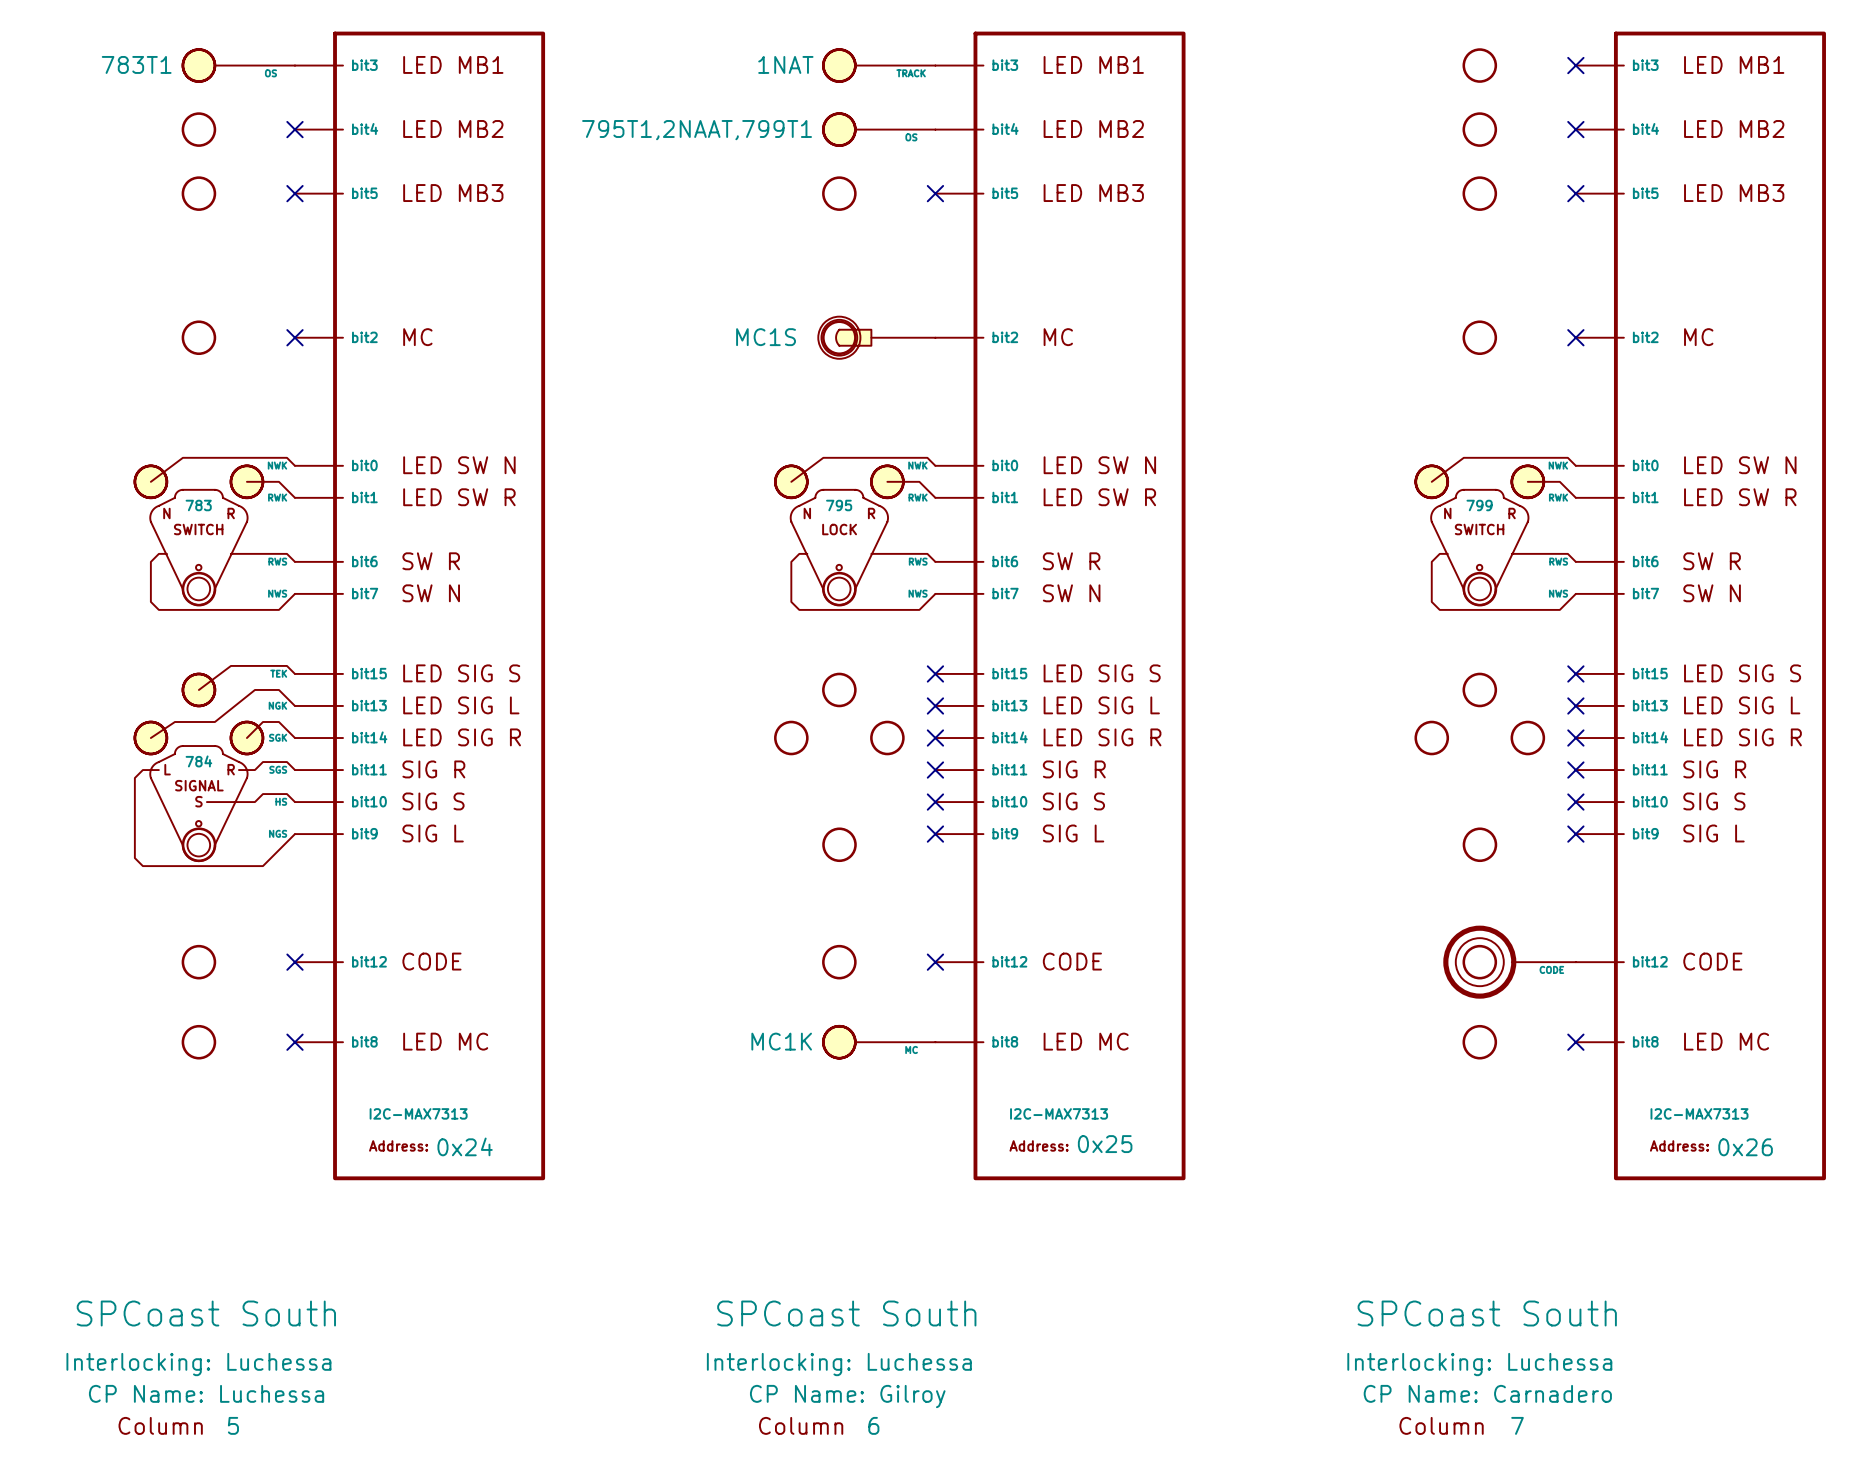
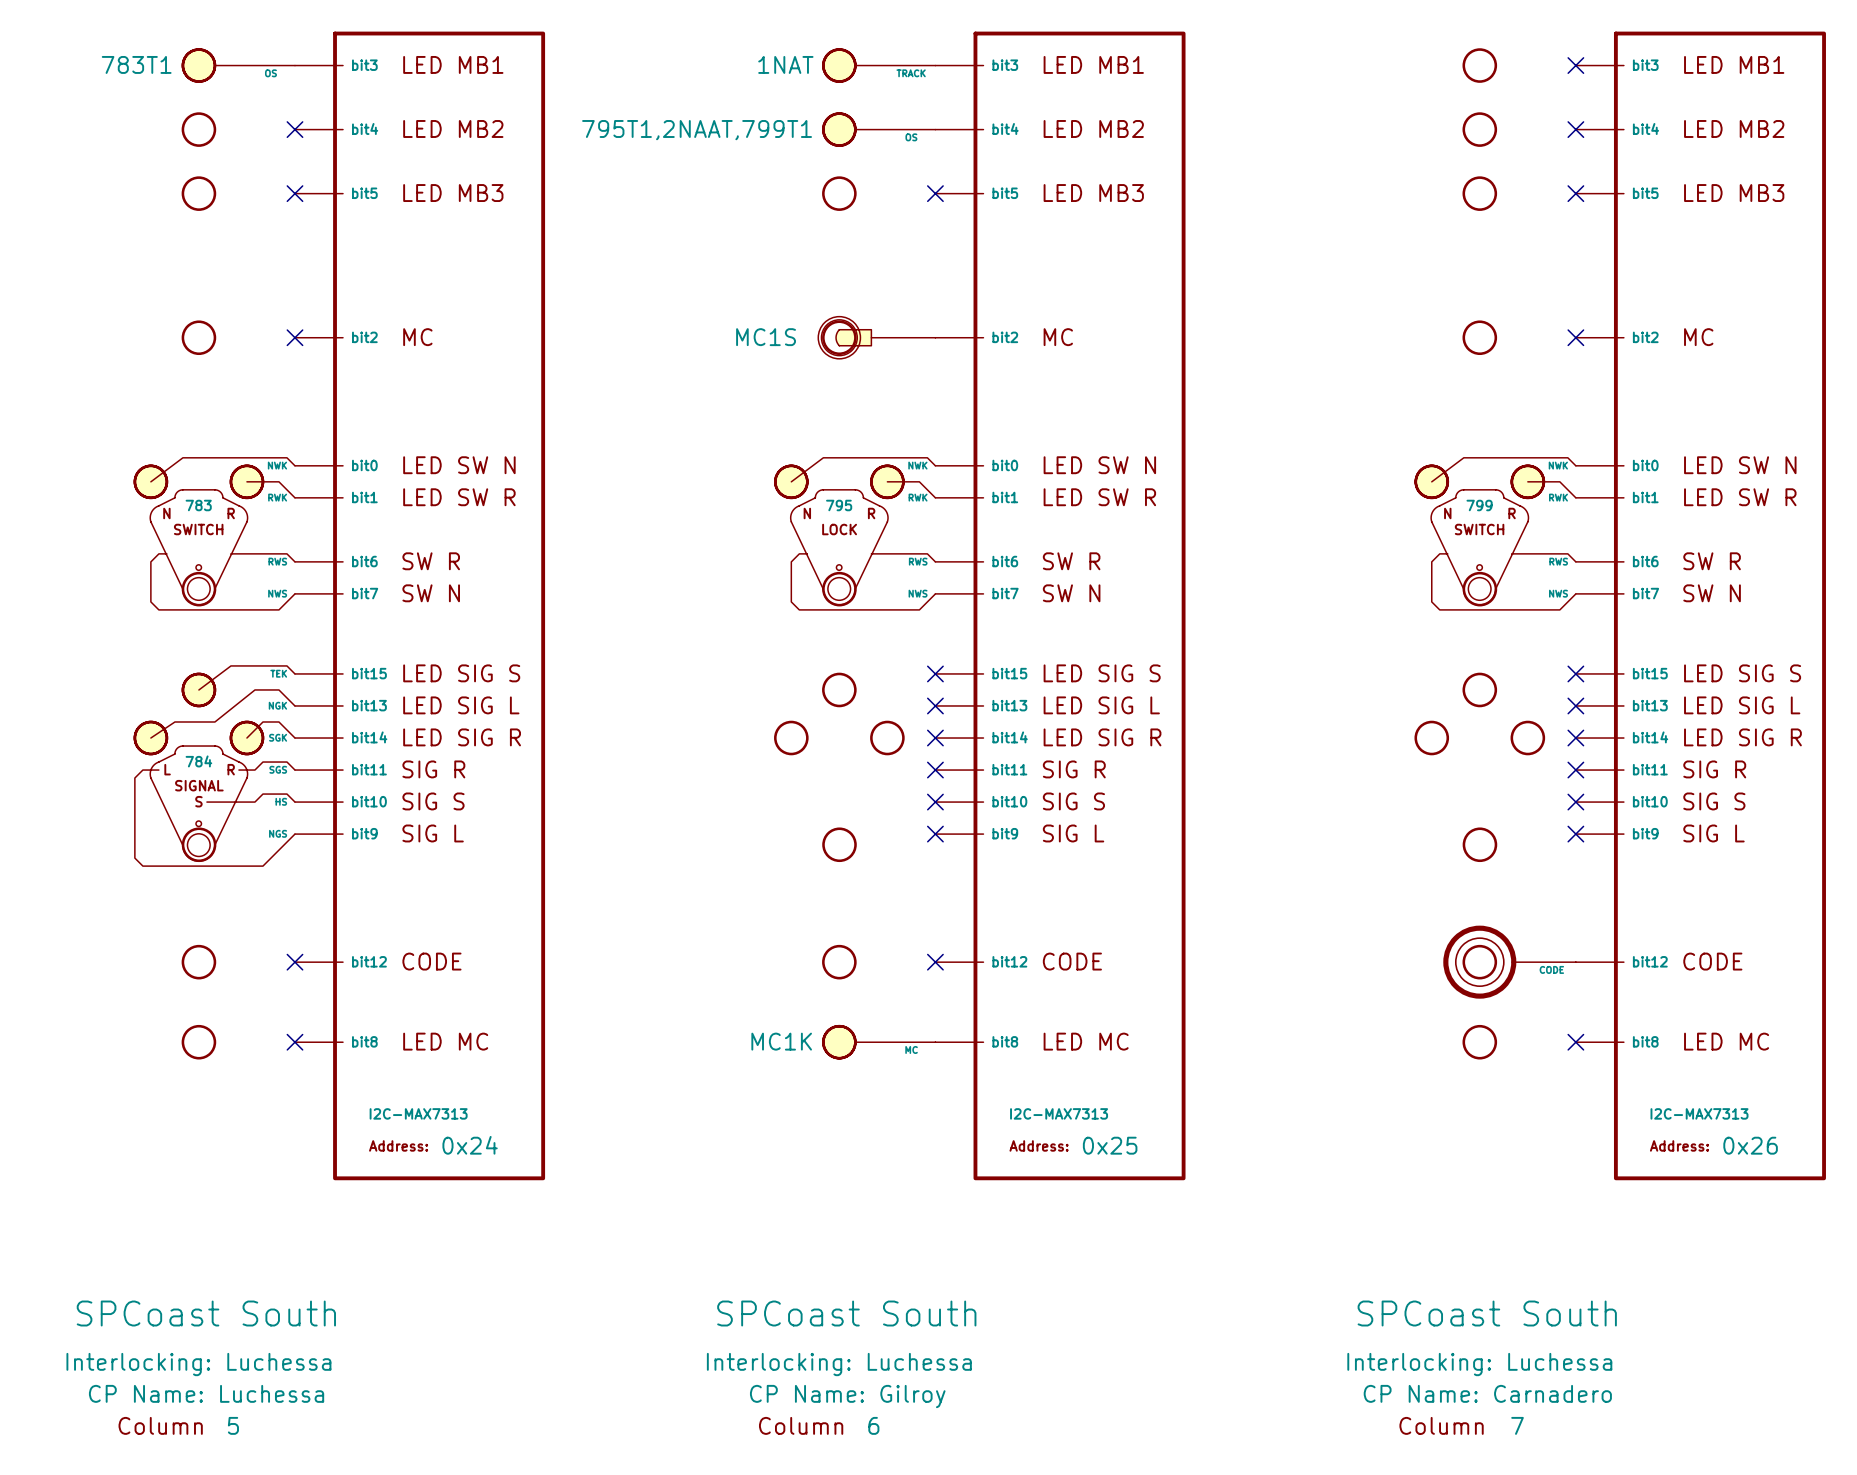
part text: 0x25 (1105, 1144) -> none
part value: none -> 0x24 (470, 1145)
part value: none -> 0x25 (1110, 1145)
part value: none -> 0x26 (1750, 1145)
part text: 0x24 (465, 1146) -> none
part text: 0x26 (1745, 1147) -> none

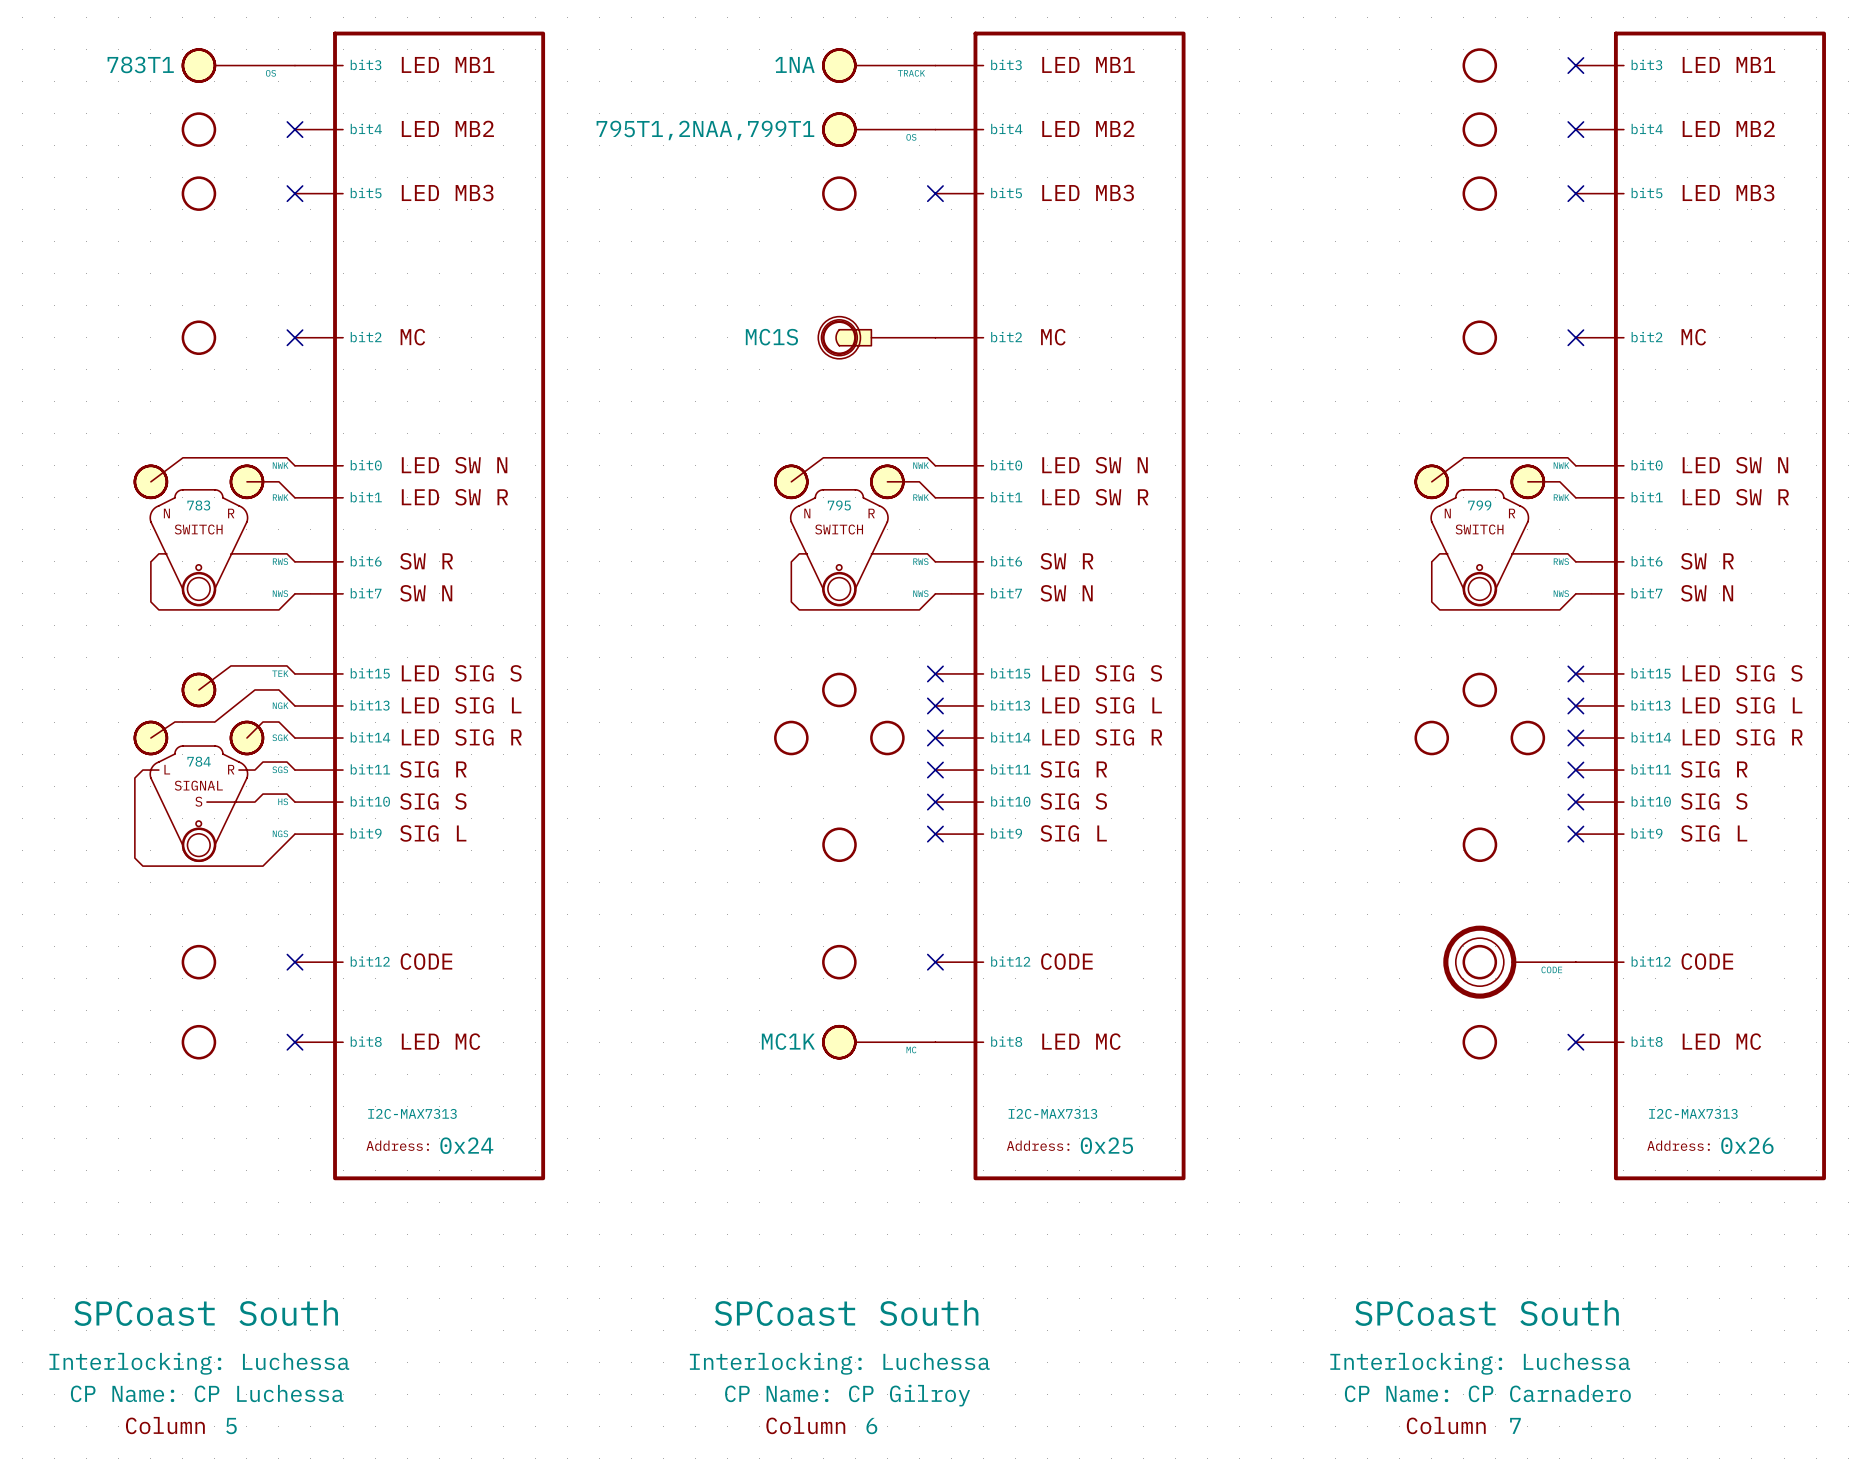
part text: 1NAT (785, 64) -> 1NA (794, 64)
part text: 795T1,2NAAT,799T1 (697, 130) -> 795T1,2NAA,799T1 (705, 130)
part text: LOCK (839, 529) -> SWITCH (839, 529)
part text: CP Name: Luchessa (206, 1393) -> CP Name: CP Luchessa (207, 1393)
part text: CP Name: Carnadero (1487, 1393) -> CP Name: CP Carnadero (1487, 1393)
part text: CP Name: Gilroy (847, 1396) -> CP Name: CP Gilroy (847, 1395)

